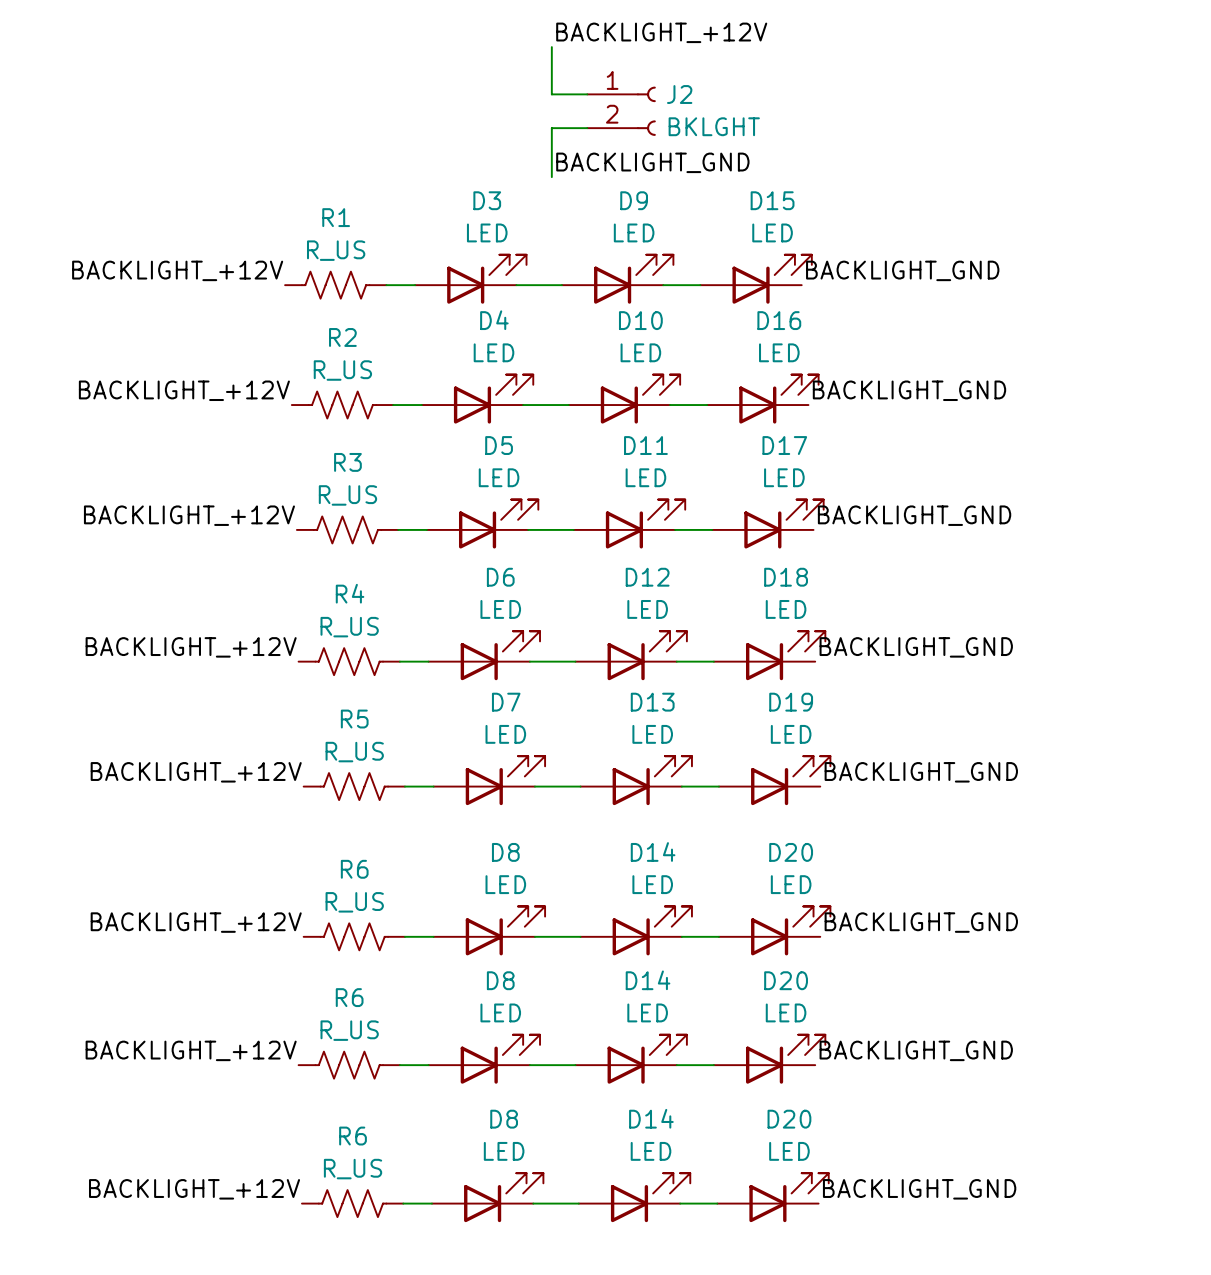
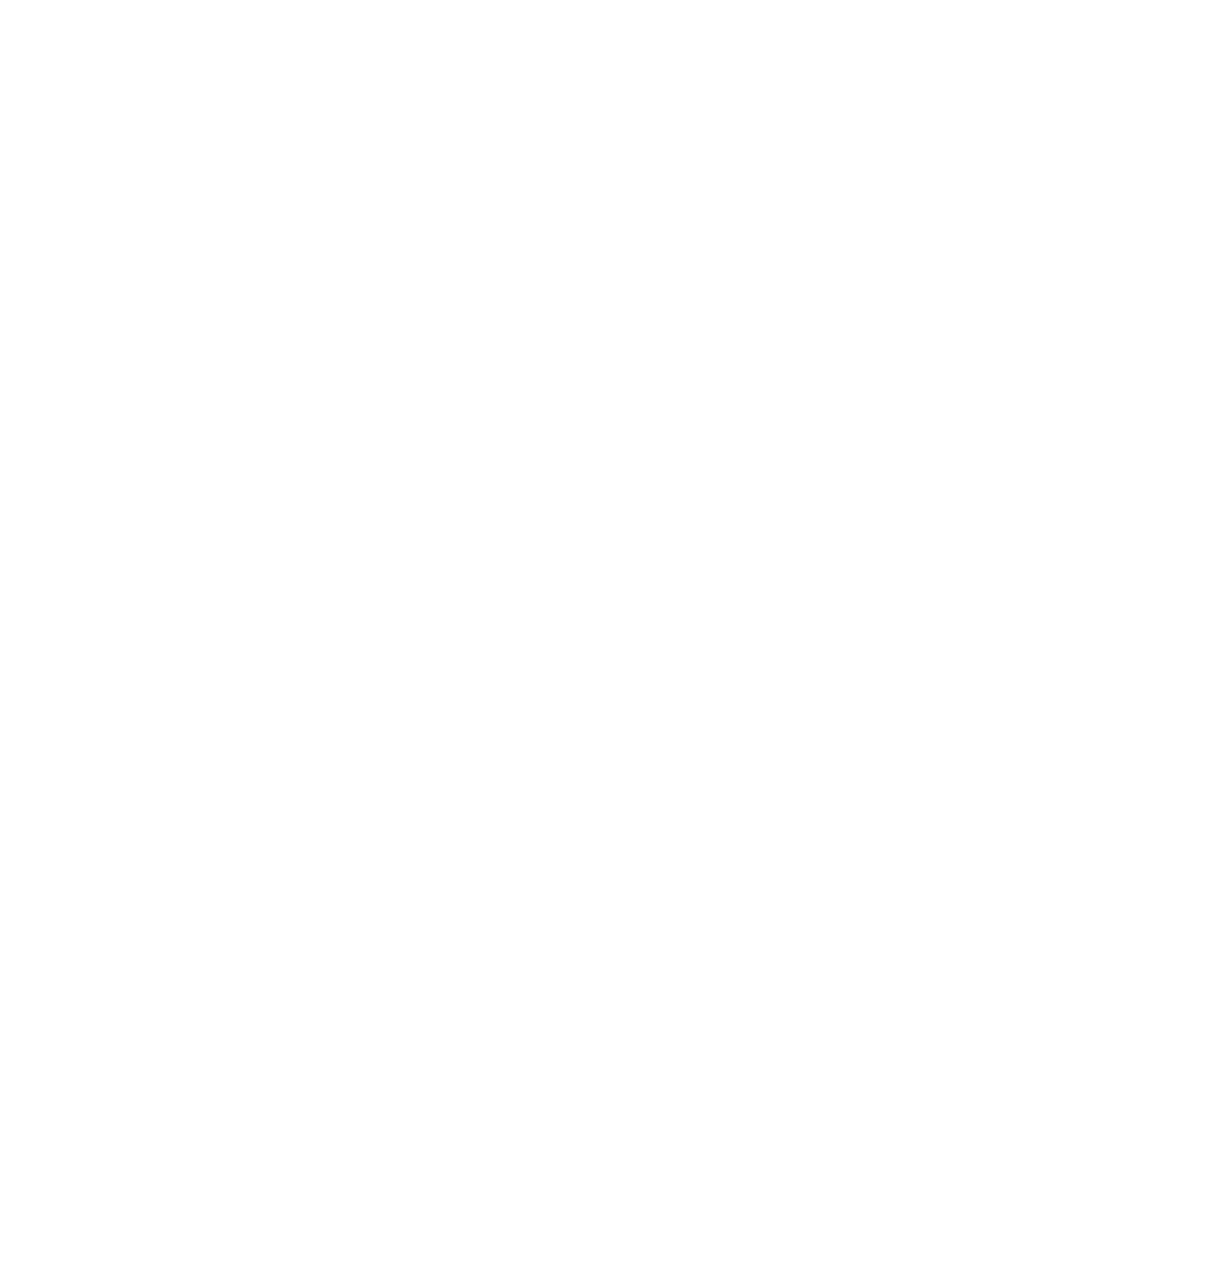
label: BACKLIGHT_+12V (661, 32) -> none
wire: (551, 47) (551, 94) (587, 94) -> none
J2: BKLGHT (621, 111) -> none
wire: (587, 128) (551, 128) (551, 177) -> none
label: BACKLIGHT_GND (652, 162) -> none
label: BACKLIGHT_+12V (177, 270) -> none
label: BACKLIGHT_GND (902, 270) -> none
D3: LED (470, 279) -> none
D9: LED (617, 279) -> none
D15: LED (756, 279) -> none
R1: R_US (335, 285) -> none
wire: (386, 285) (415, 285) -> none
wire: (516, 285) (561, 285) -> none
wire: (663, 285) (700, 285) -> none
label: BACKLIGHT_+12V (184, 390) -> none
label: BACKLIGHT_GND (909, 390) -> none
D4: LED (477, 399) -> none
D10: LED (624, 399) -> none
D16: LED (762, 399) -> none
R2: R_US (342, 405) -> none
wire: (393, 405) (421, 405) -> none
wire: (523, 405) (568, 405) -> none
wire: (670, 405) (707, 405) -> none
label: BACKLIGHT_+12V (189, 515) -> none
label: BACKLIGHT_GND (914, 515) -> none
D5: LED (482, 524) -> none
D11: LED (629, 524) -> none
D17: LED (767, 524) -> none
R3: R_US (347, 529) -> none
wire: (398, 529) (426, 529) -> none
wire: (528, 529) (573, 529) -> none
wire: (675, 529) (712, 529) -> none
label: BACKLIGHT_+12V (191, 647) -> none
label: BACKLIGHT_GND (916, 647) -> none
D6: LED (484, 655) -> none
D12: LED (631, 655) -> none
D18: LED (769, 655) -> none
R4: R_US (349, 661) -> none
wire: (399, 661) (428, 661) -> none
wire: (529, 661) (575, 661) -> none
wire: (676, 661) (713, 661) -> none
label: BACKLIGHT_+12V (196, 772) -> none
label: BACKLIGHT_GND (921, 772) -> none
D7: LED (489, 780) -> none
D13: LED (636, 780) -> none
D19: LED (774, 780) -> none
R5: R_US (354, 786) -> none
wire: (404, 786) (433, 786) -> none
wire: (534, 786) (580, 786) -> none
wire: (681, 786) (718, 786) -> none
label: BACKLIGHT_+12V (196, 922) -> none
label: BACKLIGHT_GND (921, 922) -> none
D8: LED (489, 930) -> none
D14: LED (636, 930) -> none
D20: LED (774, 930) -> none
R6: R_US (354, 936) -> none
wire: (404, 936) (433, 936) -> none
wire: (534, 936) (580, 936) -> none
wire: (681, 936) (718, 936) -> none
label: BACKLIGHT_+12V (191, 1050) -> none
label: BACKLIGHT_GND (916, 1050) -> none
D8: LED (484, 1059) -> none
D14: LED (631, 1059) -> none
D20: LED (769, 1059) -> none
R6: R_US (349, 1065) -> none
wire: (399, 1065) (428, 1065) -> none
wire: (529, 1065) (575, 1065) -> none
wire: (676, 1065) (713, 1065) -> none
label: BACKLIGHT_+12V (194, 1189) -> none
label: BACKLIGHT_GND (919, 1189) -> none
D8: LED (487, 1197) -> none
D14: LED (634, 1197) -> none
D20: LED (773, 1197) -> none
R6: R_US (352, 1203) -> none
wire: (403, 1203) (431, 1203) -> none
wire: (533, 1203) (578, 1203) -> none
wire: (680, 1203) (717, 1203) -> none

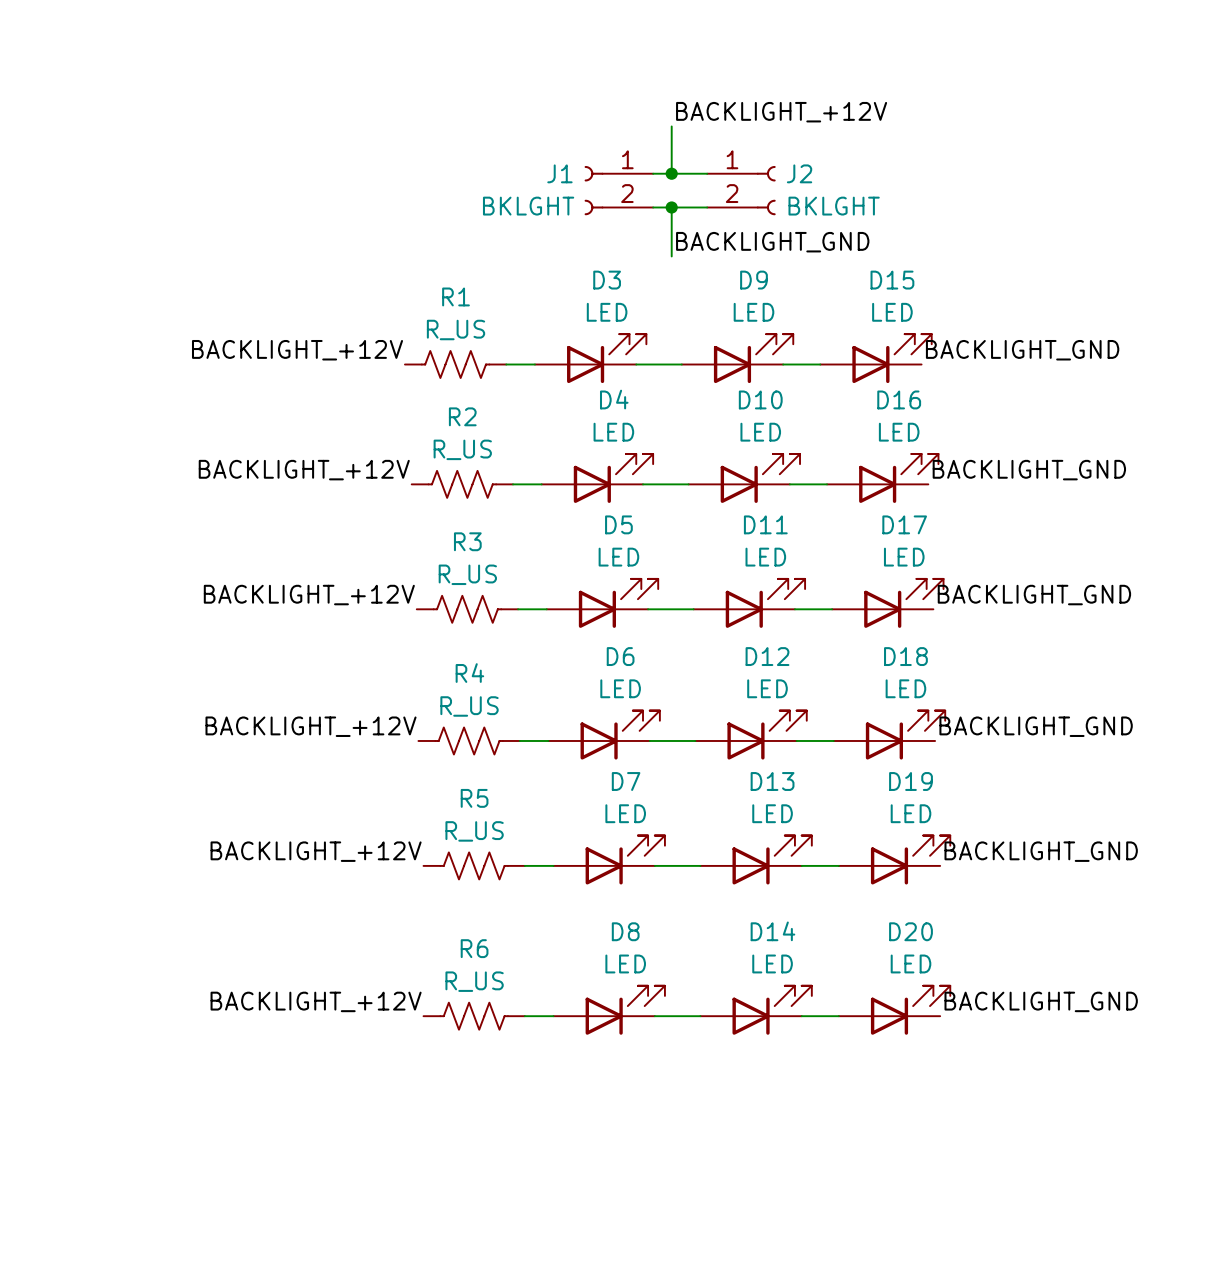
label: none -> BACKLIGHT_+12V (781, 112)
wire: none -> (671, 126) (671, 173)
wire: none -> (653, 173) (707, 173)
junction: none -> (671, 173)
J1: none -> BKLGHT (618, 190)
J2: none -> BKLGHT (741, 190)
wire: none -> (653, 207) (707, 207)
wire: none -> (671, 207) (671, 256)
junction: none -> (671, 207)
label: none -> BACKLIGHT_GND (772, 242)
label: none -> BACKLIGHT_+12V (297, 350)
label: none -> BACKLIGHT_GND (1022, 350)
D3: none -> LED (590, 358)
D9: none -> LED (737, 358)
D15: none -> LED (875, 358)
R1: none -> R_US (455, 364)
wire: none -> (506, 364) (534, 364)
wire: none -> (636, 364) (681, 364)
wire: none -> (783, 364) (820, 364)
label: none -> BACKLIGHT_+12V (304, 470)
label: none -> BACKLIGHT_GND (1029, 470)
D4: none -> LED (597, 478)
D10: none -> LED (744, 478)
D16: none -> LED (882, 478)
R2: none -> R_US (462, 484)
wire: none -> (513, 484) (541, 484)
wire: none -> (643, 484) (688, 484)
wire: none -> (789, 484) (827, 484)
label: none -> BACKLIGHT_+12V (309, 595)
label: none -> BACKLIGHT_GND (1034, 595)
D5: none -> LED (602, 603)
D11: none -> LED (749, 603)
D17: none -> LED (887, 603)
R3: none -> R_US (467, 609)
wire: none -> (518, 609) (546, 609)
wire: none -> (648, 609) (693, 609)
wire: none -> (794, 609) (832, 609)
label: none -> BACKLIGHT_+12V (311, 726)
label: none -> BACKLIGHT_GND (1036, 726)
D6: none -> LED (604, 735)
D12: none -> LED (751, 735)
D18: none -> LED (889, 735)
R4: none -> R_US (469, 740)
wire: none -> (519, 740) (548, 740)
wire: none -> (649, 740) (695, 740)
wire: none -> (796, 740) (833, 740)
label: none -> BACKLIGHT_+12V (316, 851)
label: none -> BACKLIGHT_GND (1041, 851)
D7: none -> LED (609, 860)
D13: none -> LED (756, 860)
D19: none -> LED (894, 860)
R5: none -> R_US (474, 865)
wire: none -> (524, 865) (553, 865)
wire: none -> (654, 865) (700, 865)
wire: none -> (801, 865) (838, 865)
label: none -> BACKLIGHT_+12V (316, 1001)
label: none -> BACKLIGHT_GND (1041, 1001)
D8: none -> LED (609, 1010)
D14: none -> LED (756, 1010)
D20: none -> LED (894, 1010)
R6: none -> R_US (474, 1016)
wire: none -> (524, 1016) (553, 1016)
wire: none -> (654, 1016) (700, 1016)
wire: none -> (801, 1016) (838, 1016)

